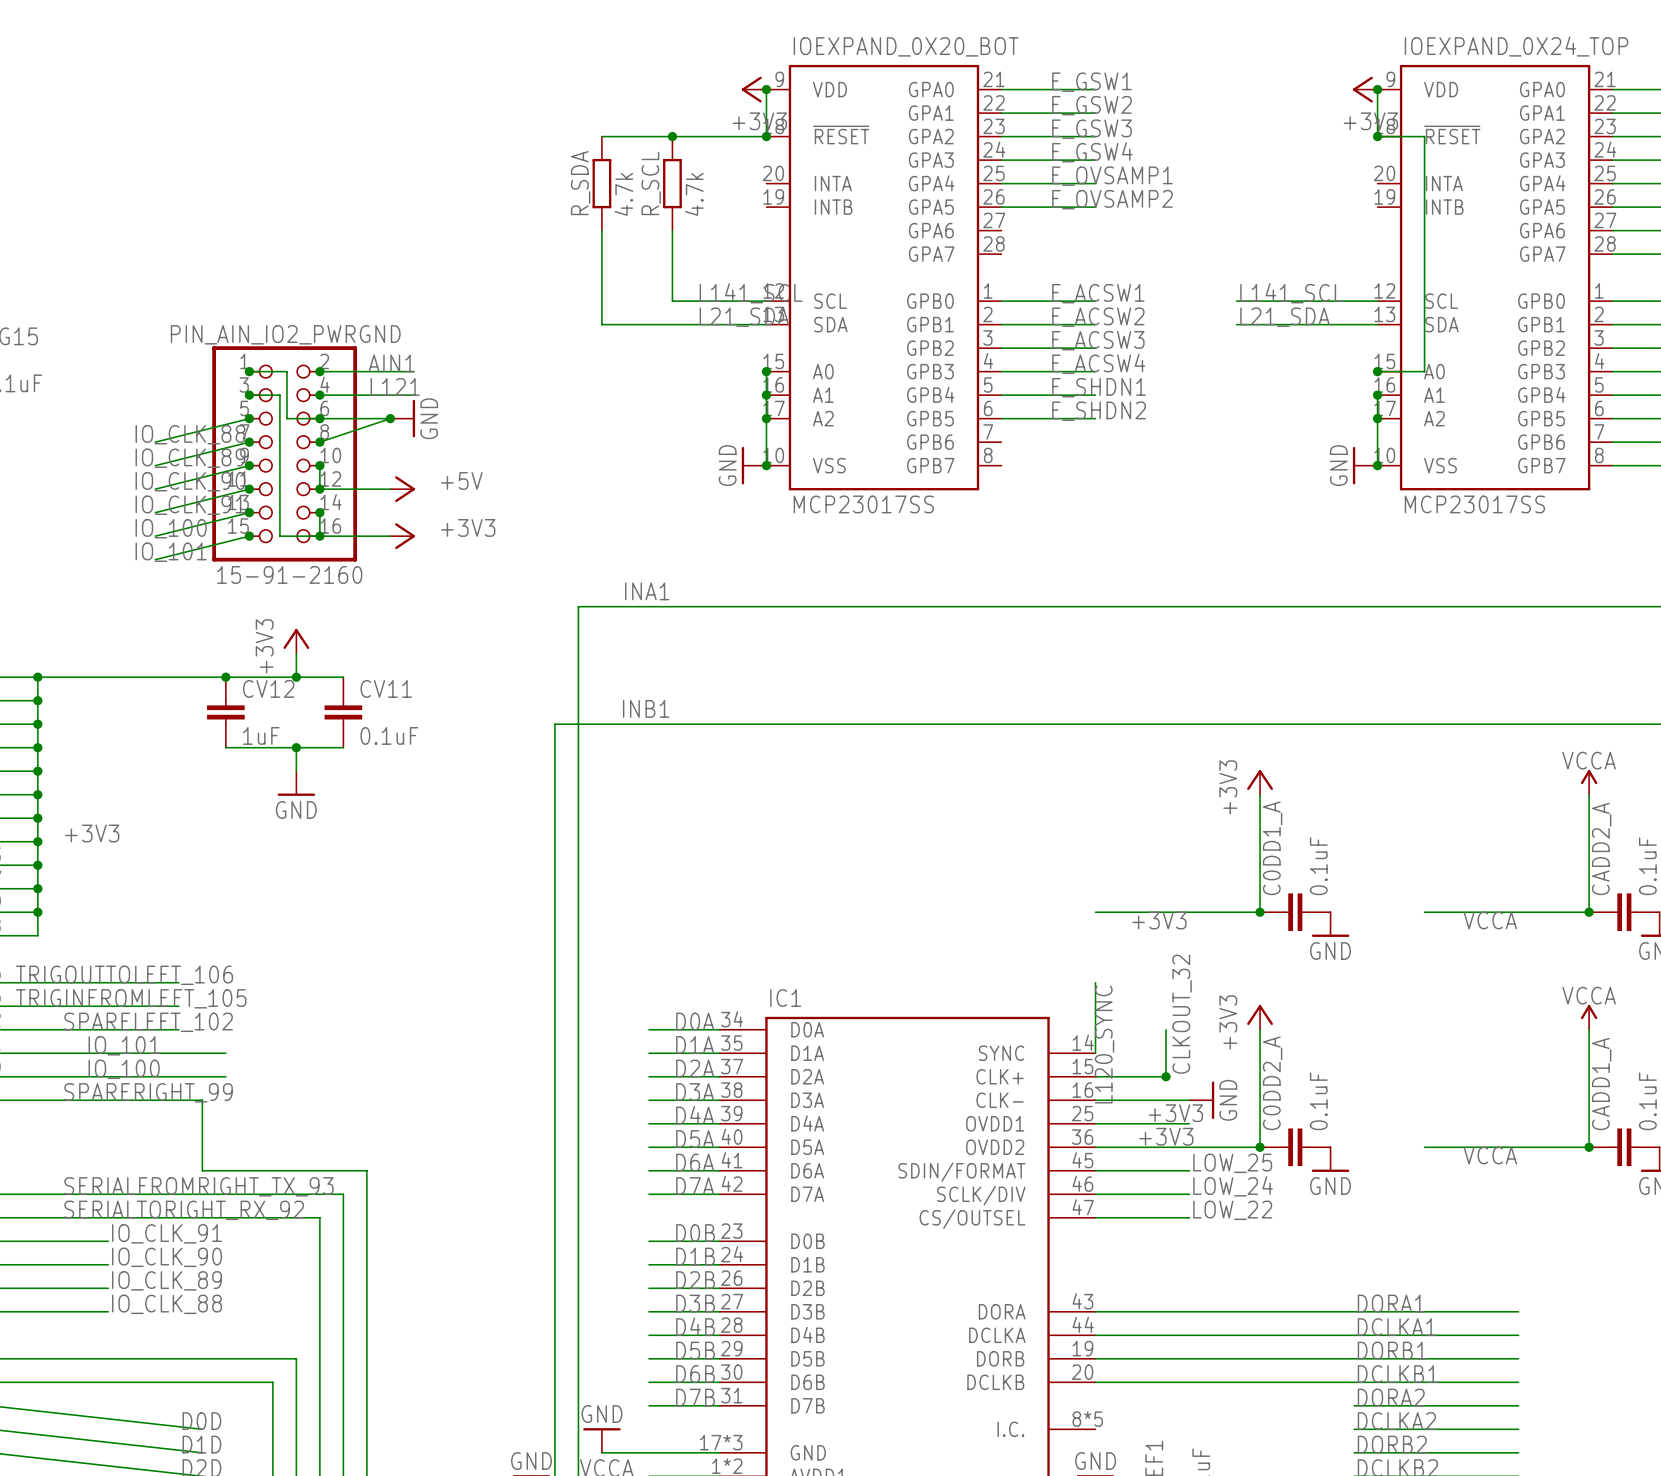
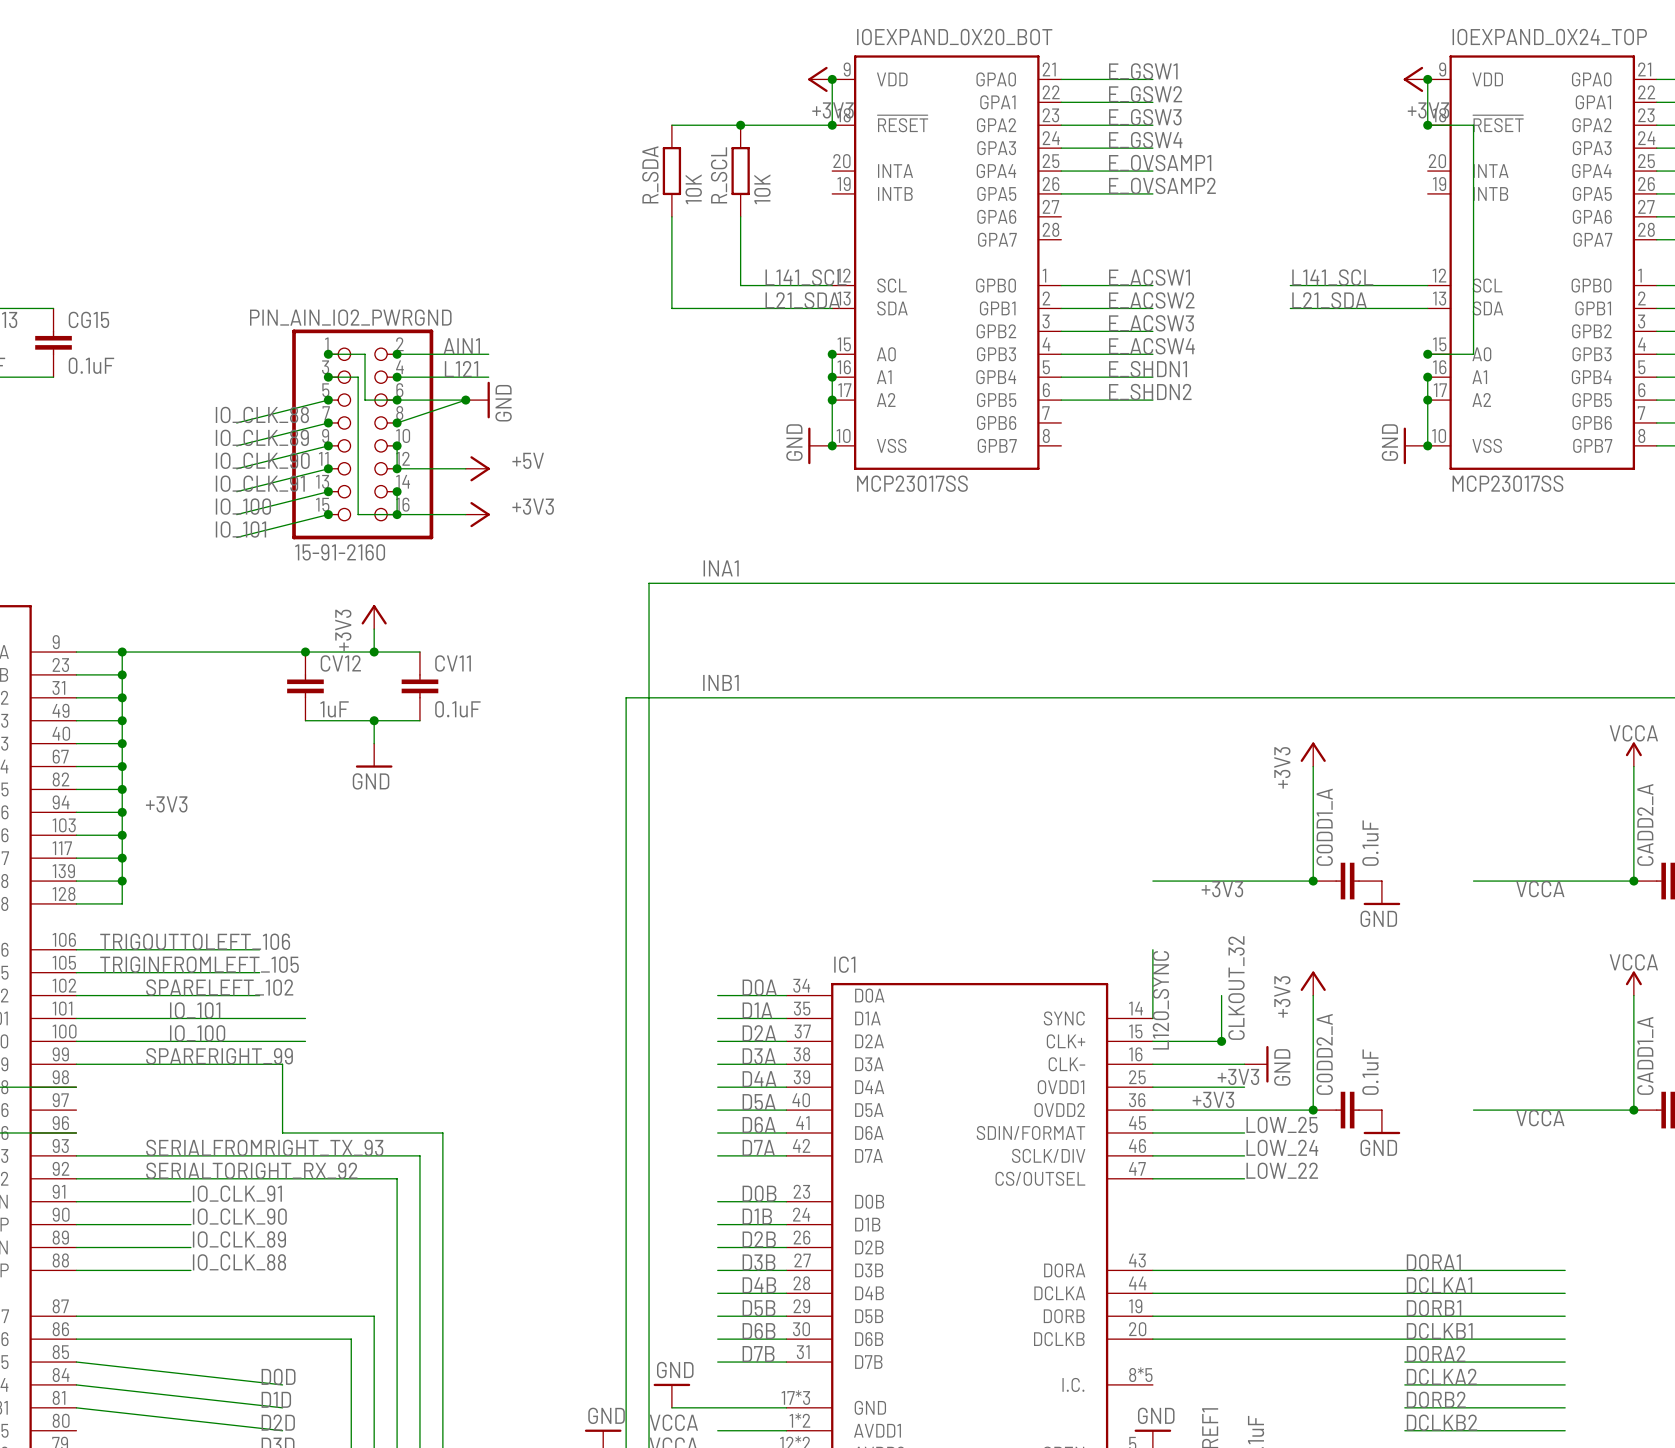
R_SDA value: 4.7k (623, 194) -> 10K (693, 189)
R_SCL value: 4.7k (694, 194) -> 10K (762, 189)

